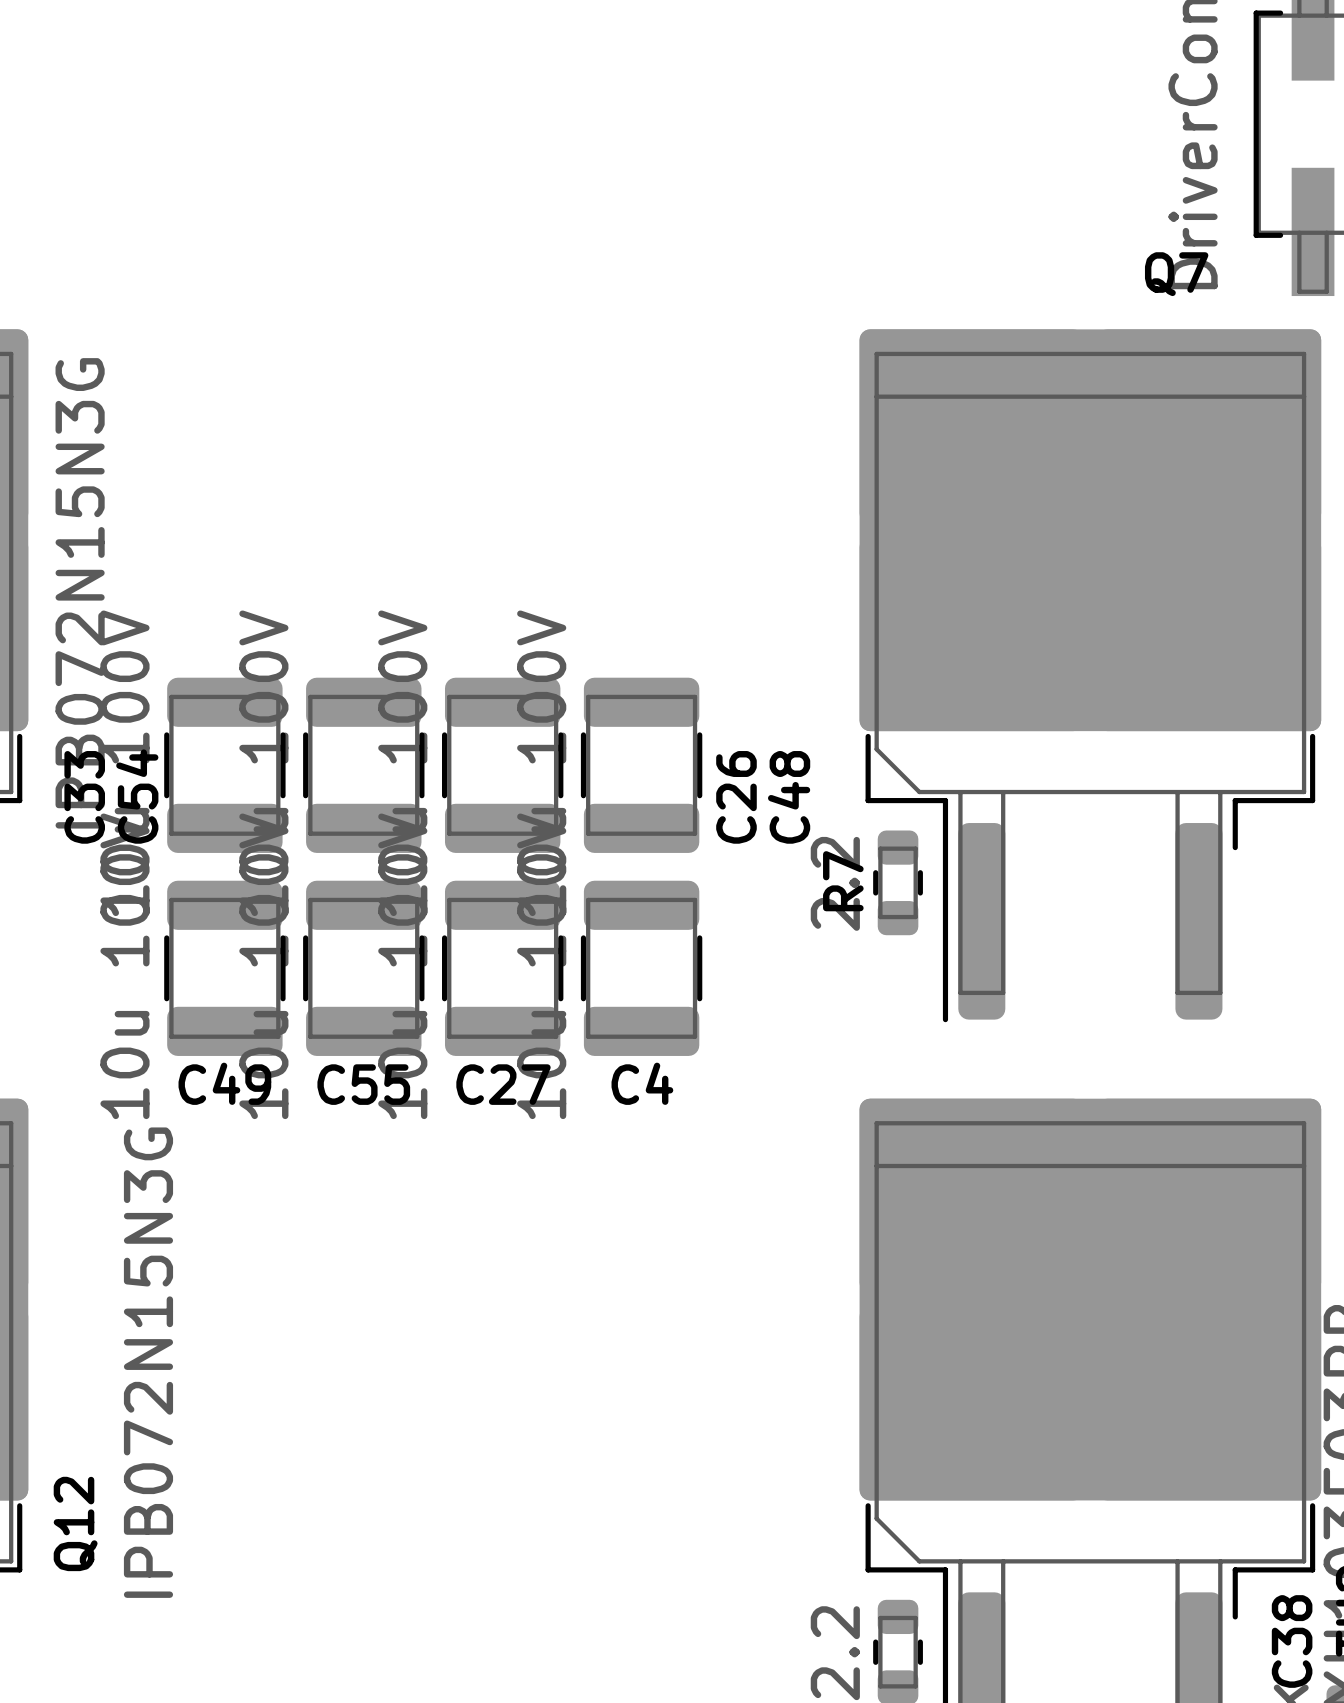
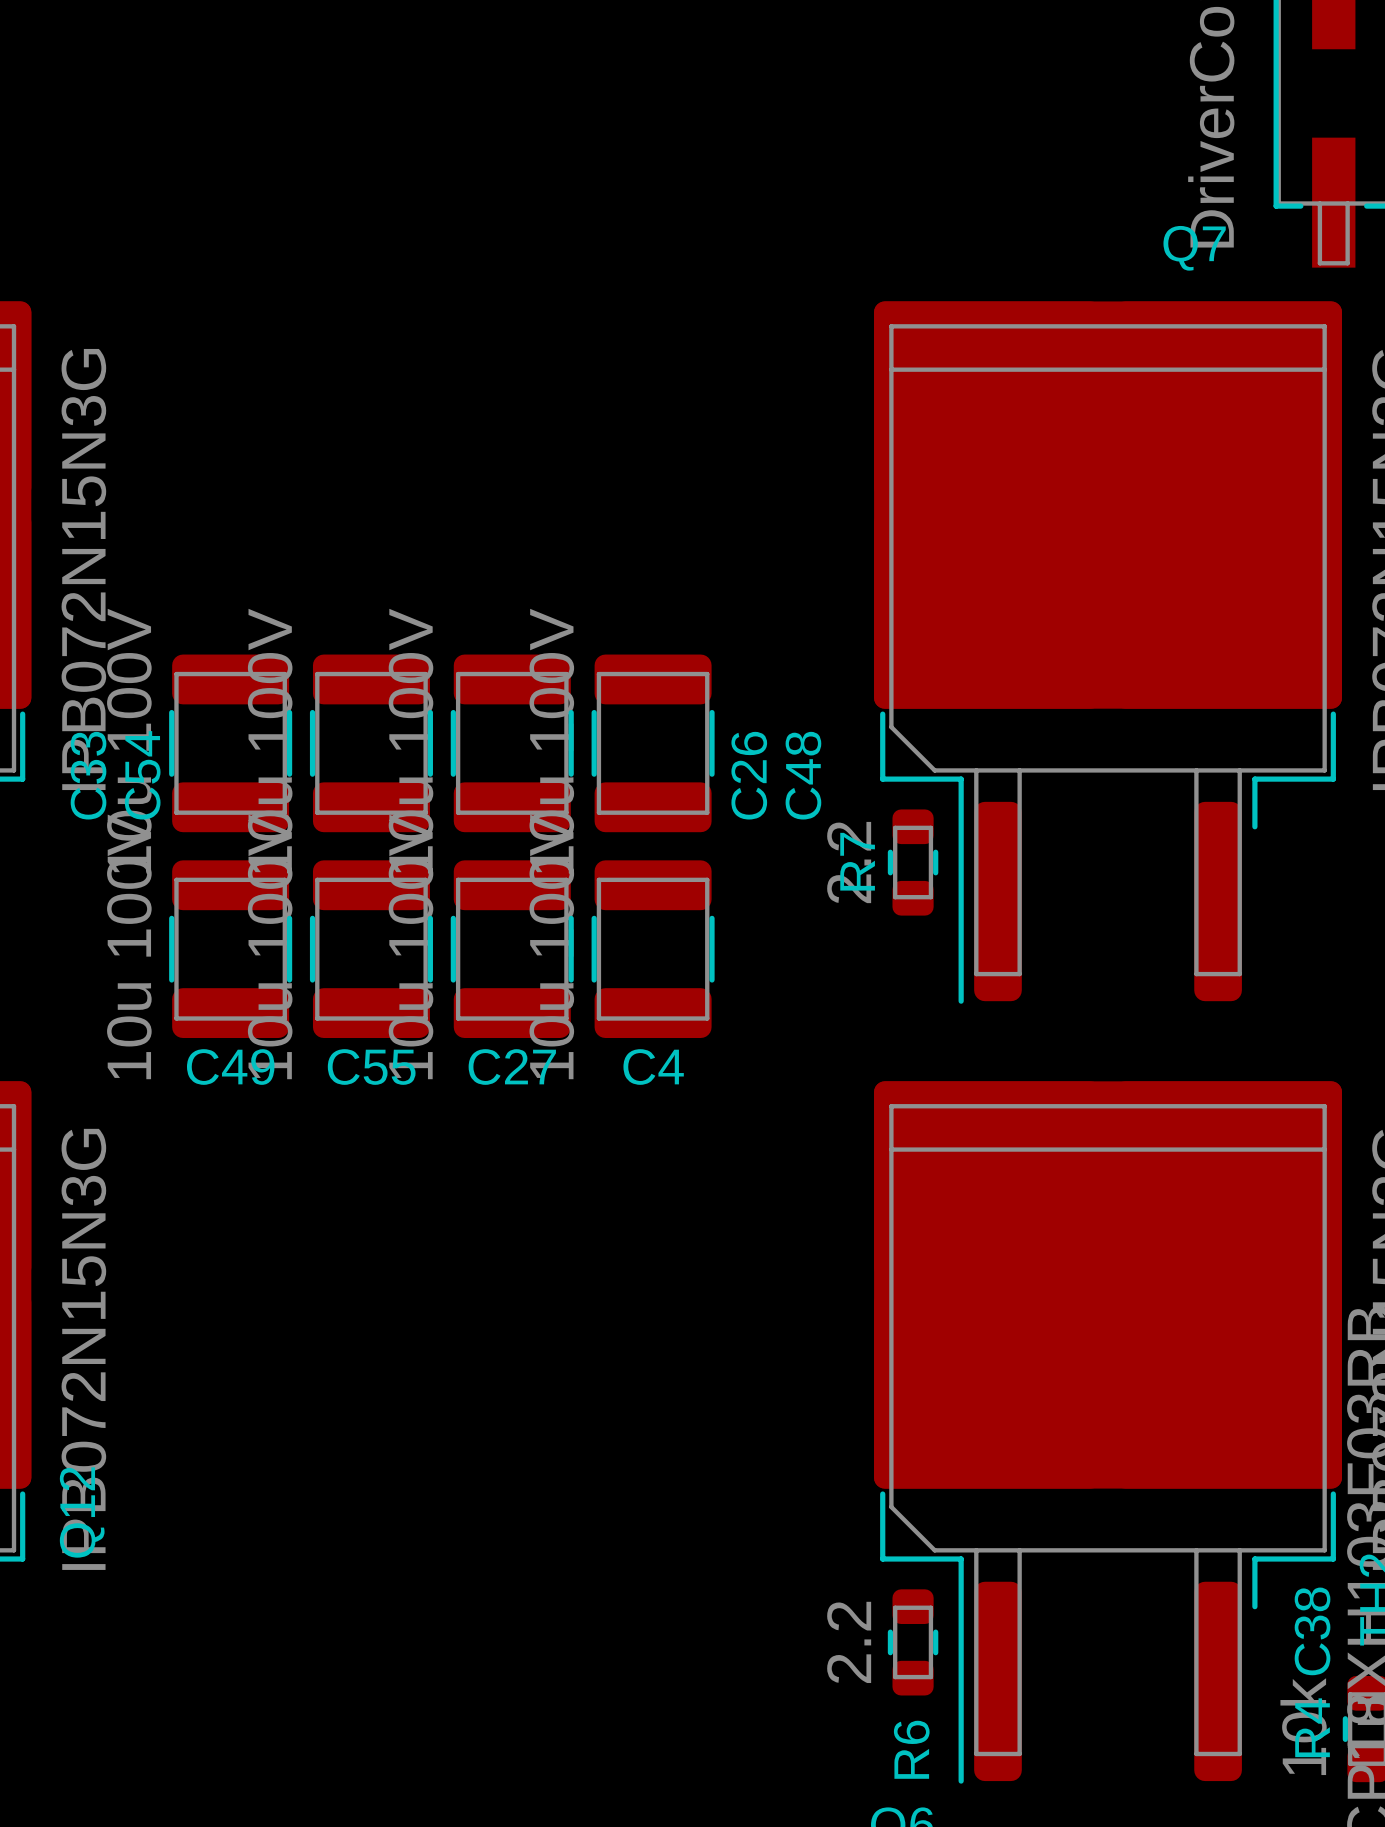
Q12 value position: IPB072N15N3G (148, 1362) -> IPB072N15N3G (83, 1349)

